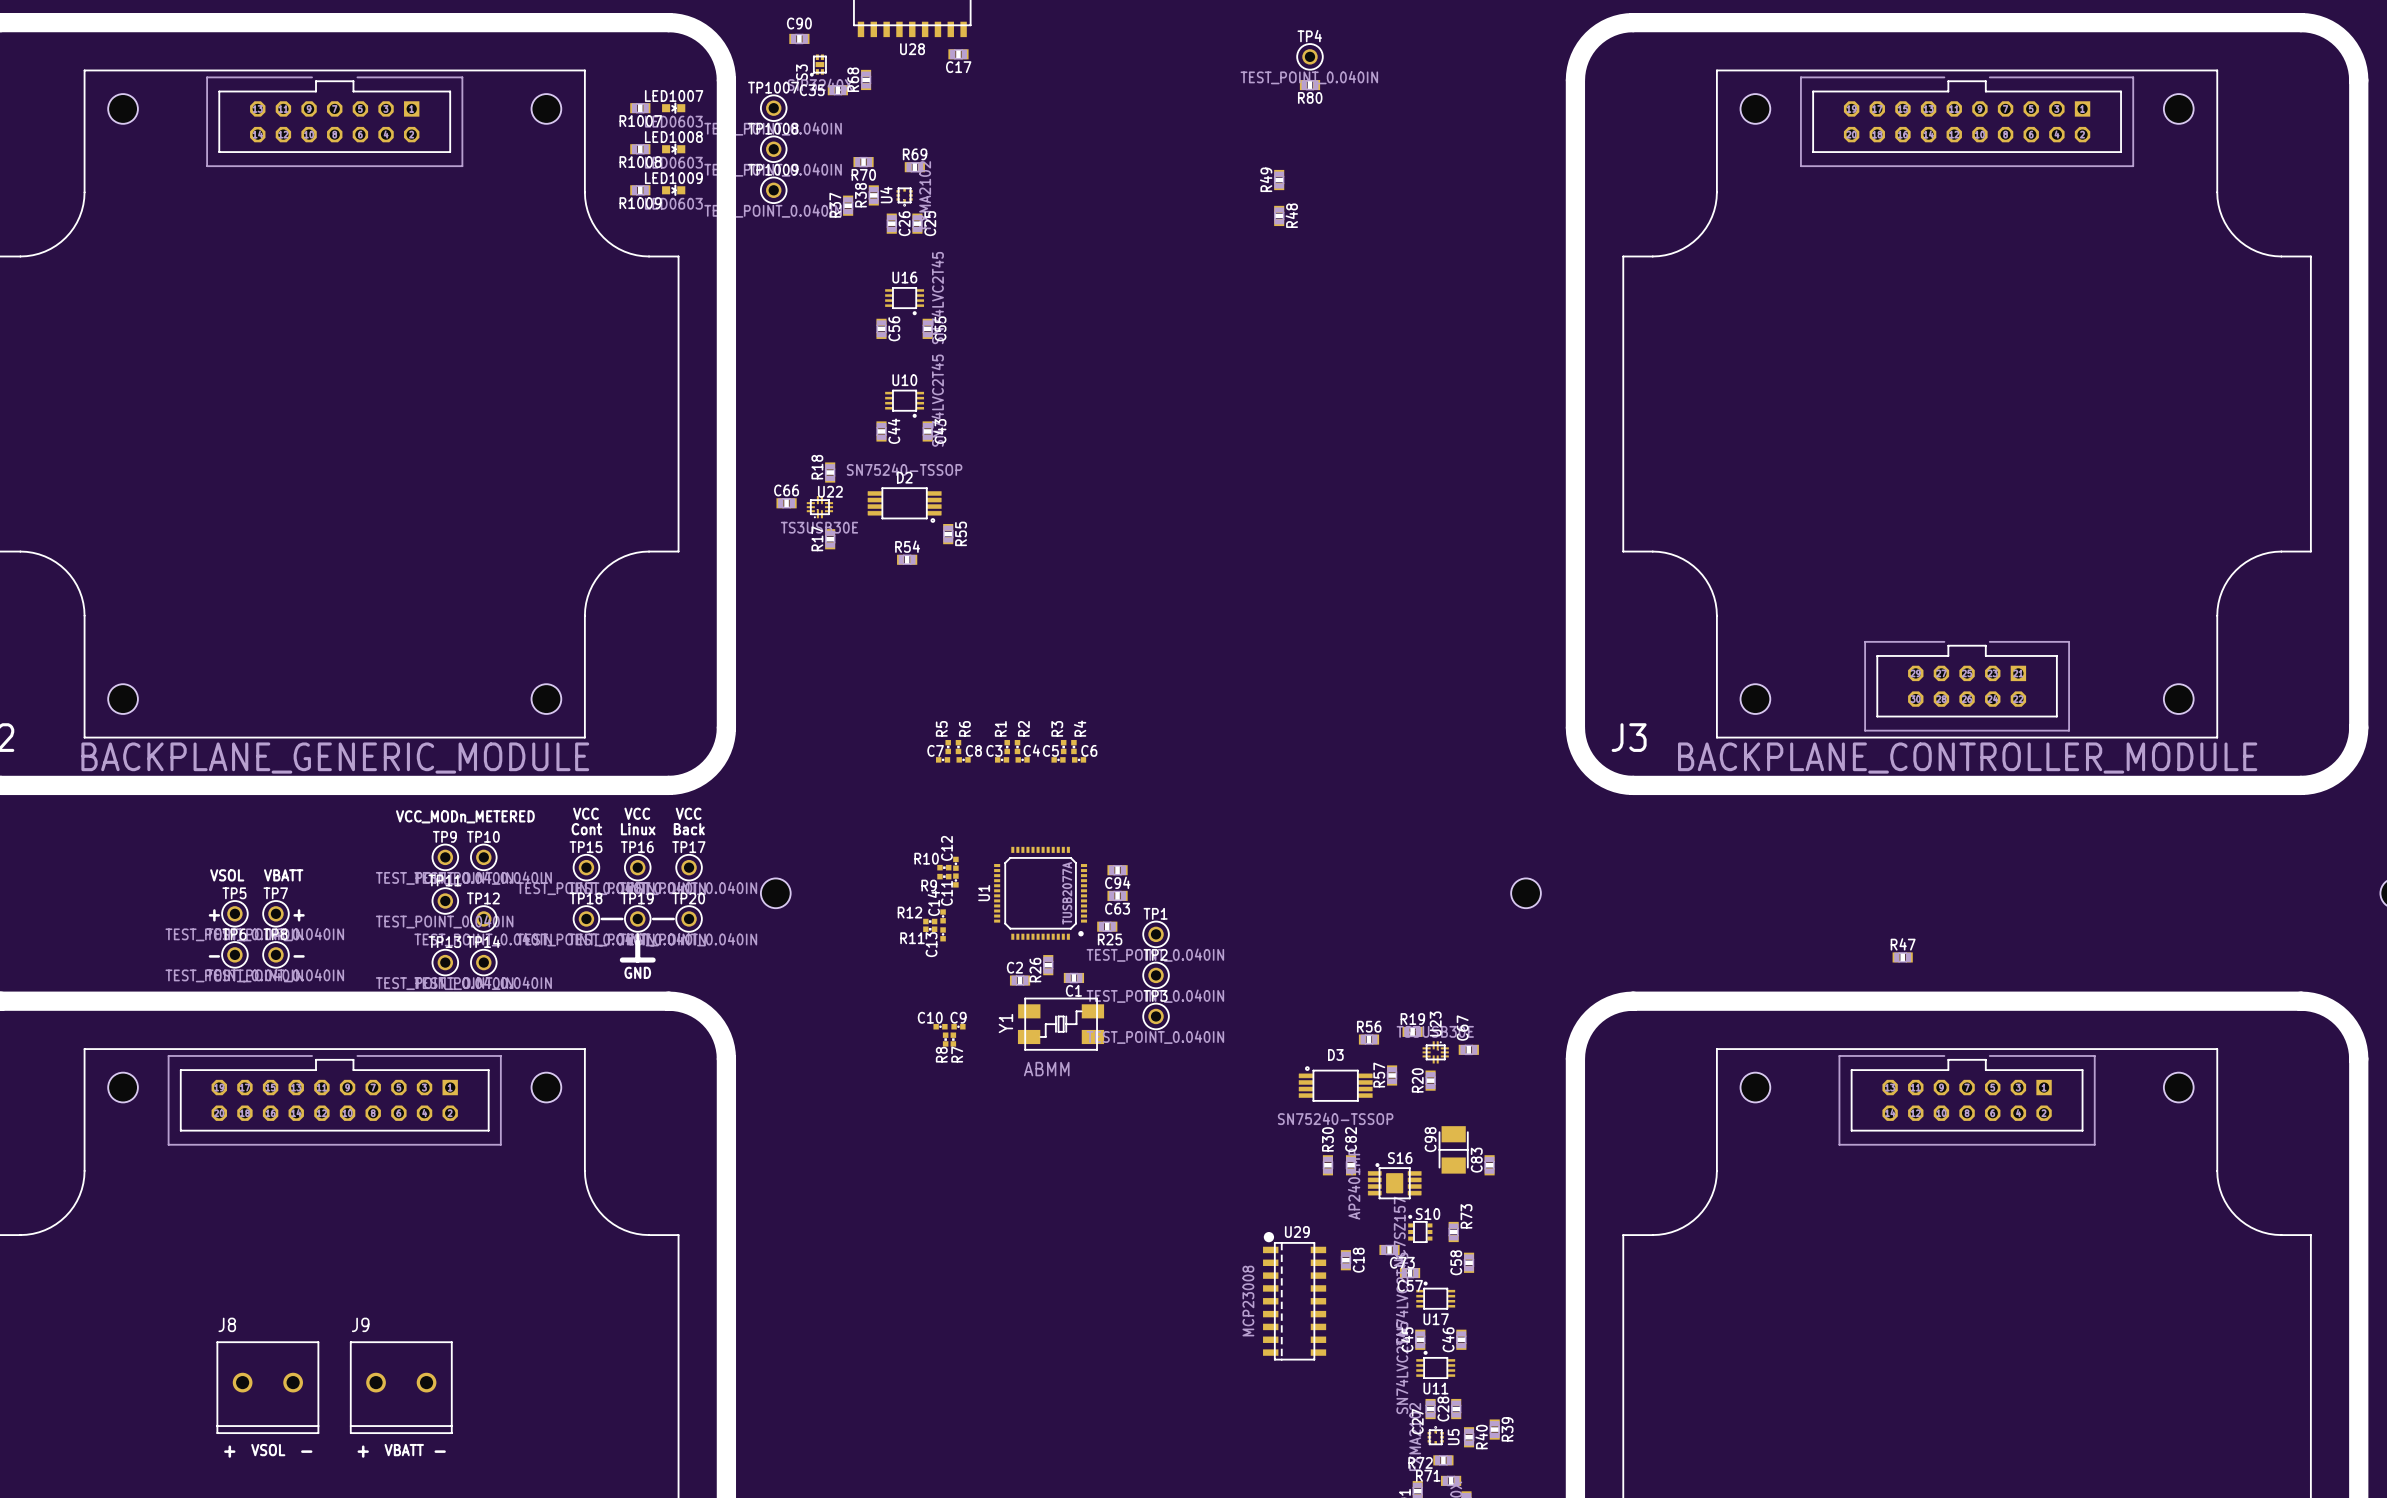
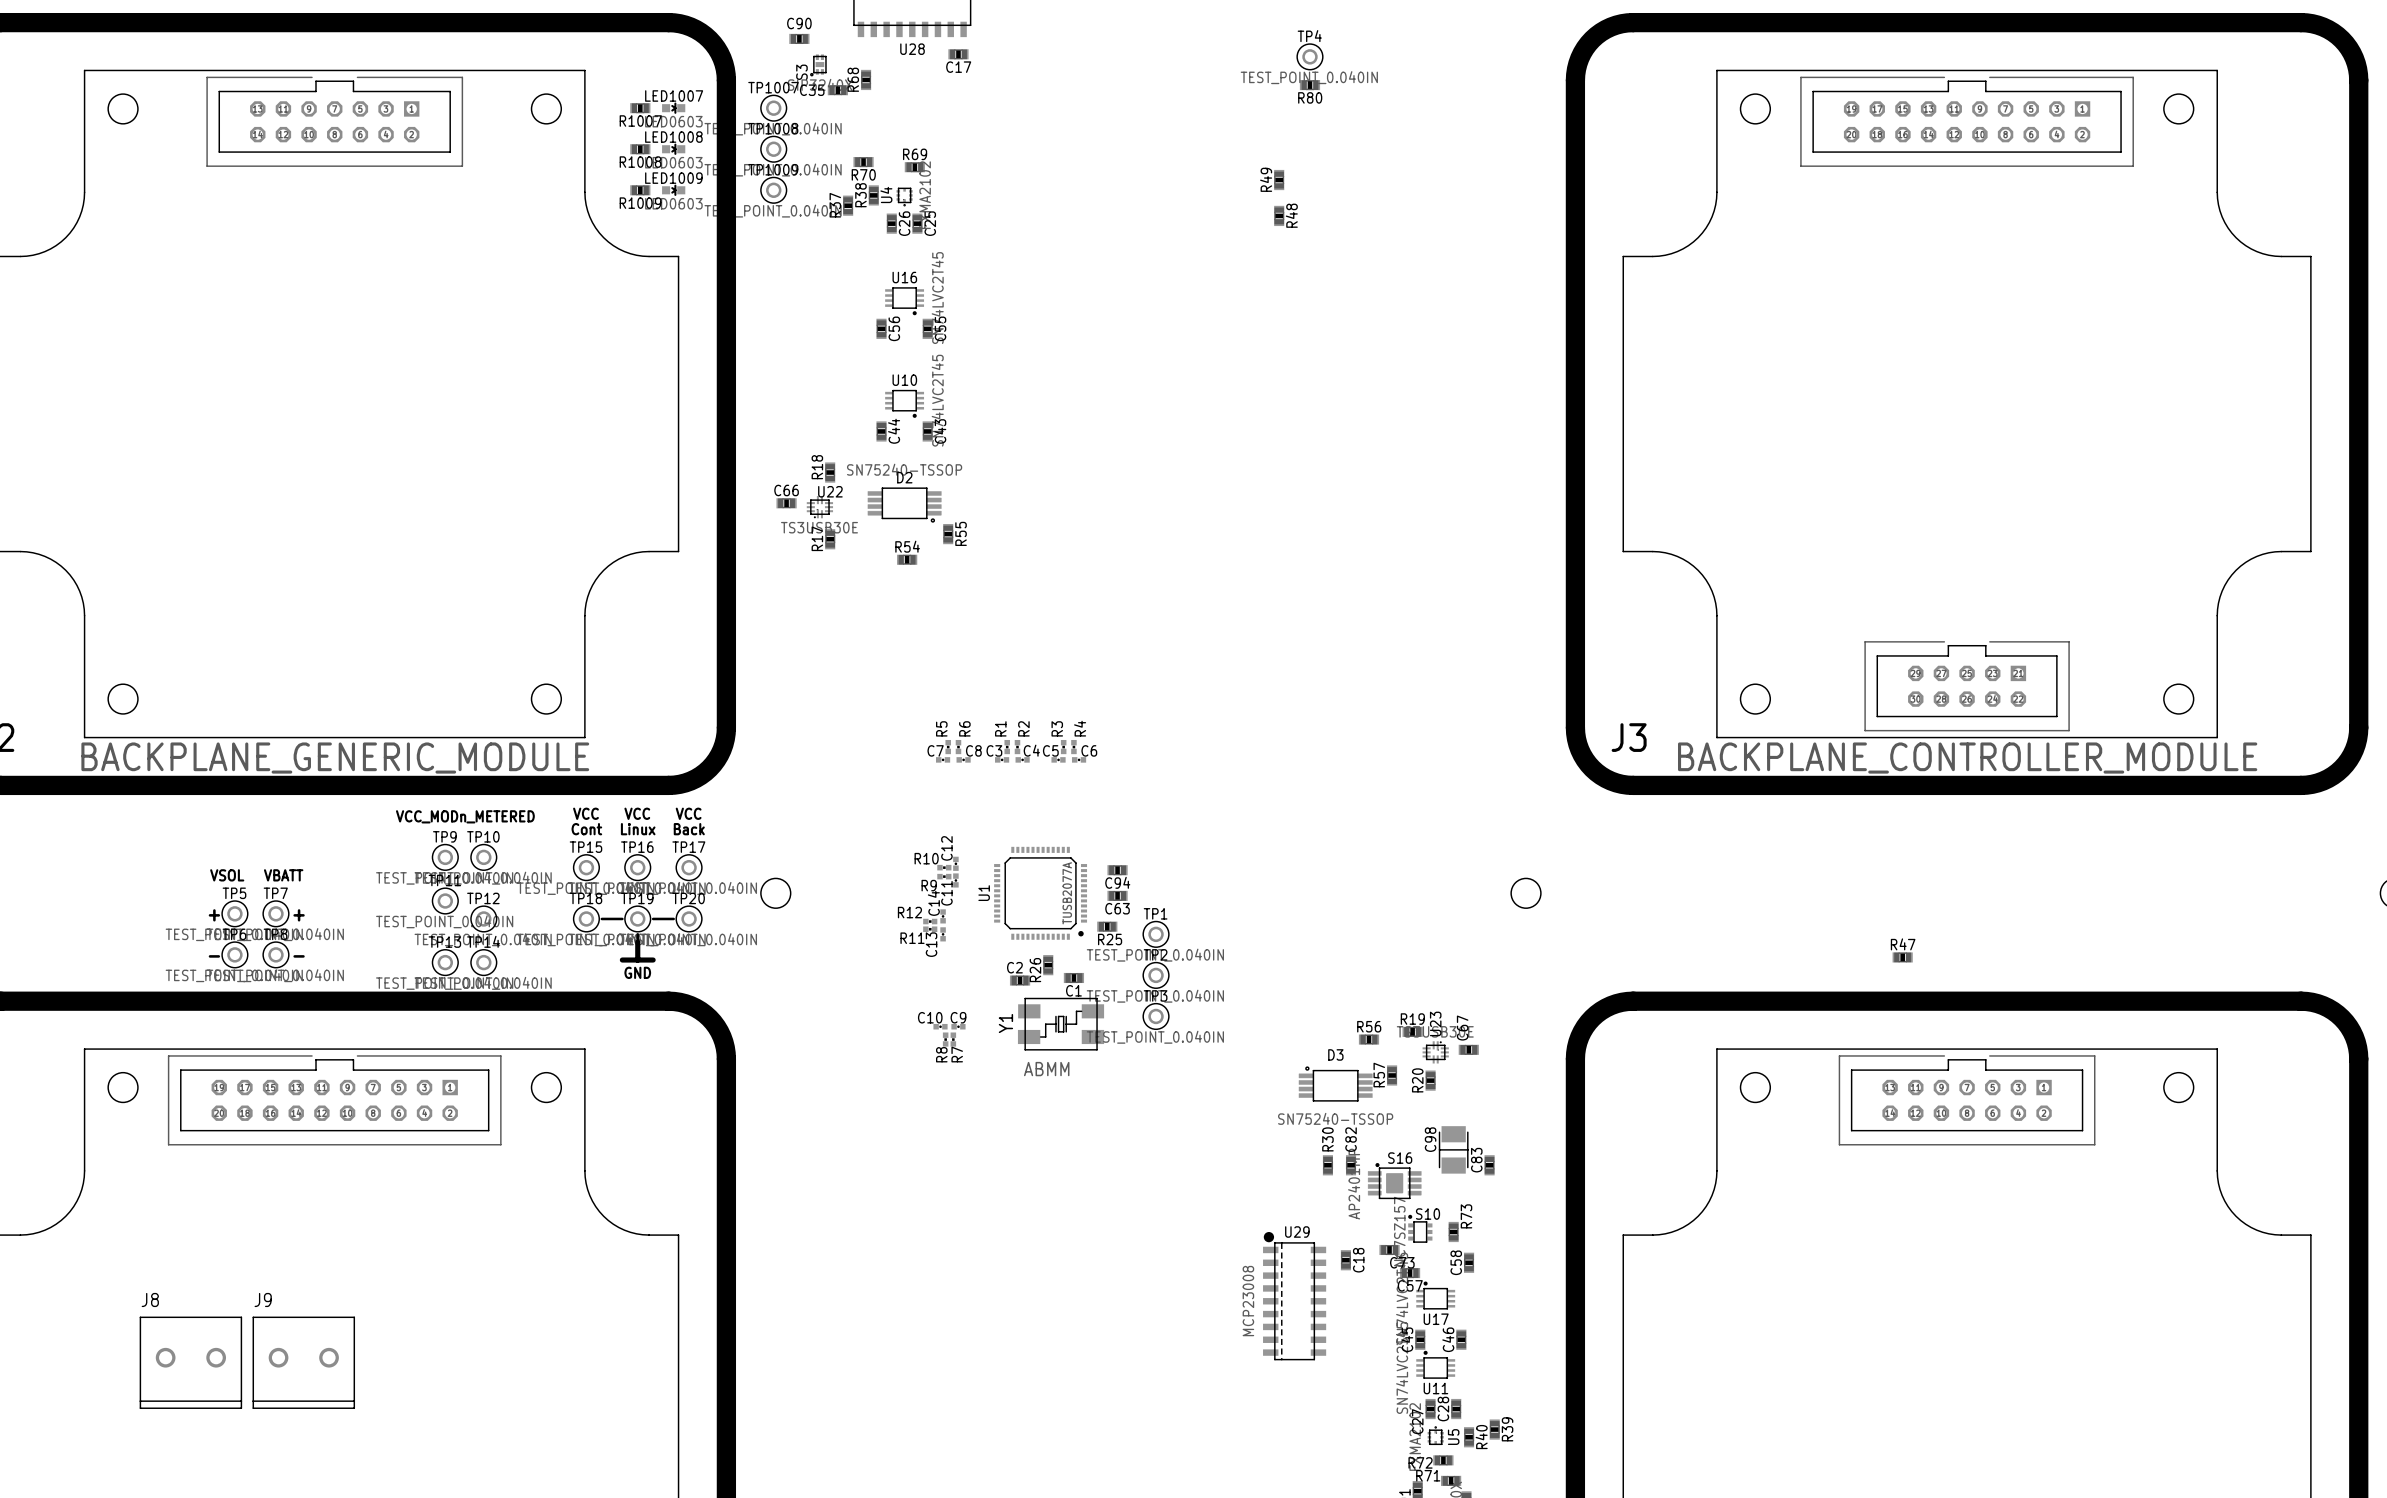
J8 position: (267, 1387) -> (190, 1362)
J9 position: (401, 1387) -> (303, 1362)
text: VSOL (268, 1450) -> none
text: VBATT (404, 1450) -> none
text: + (229, 1451) -> none
text: - (306, 1451) -> none
text: + (363, 1451) -> none
text: - (440, 1451) -> none

